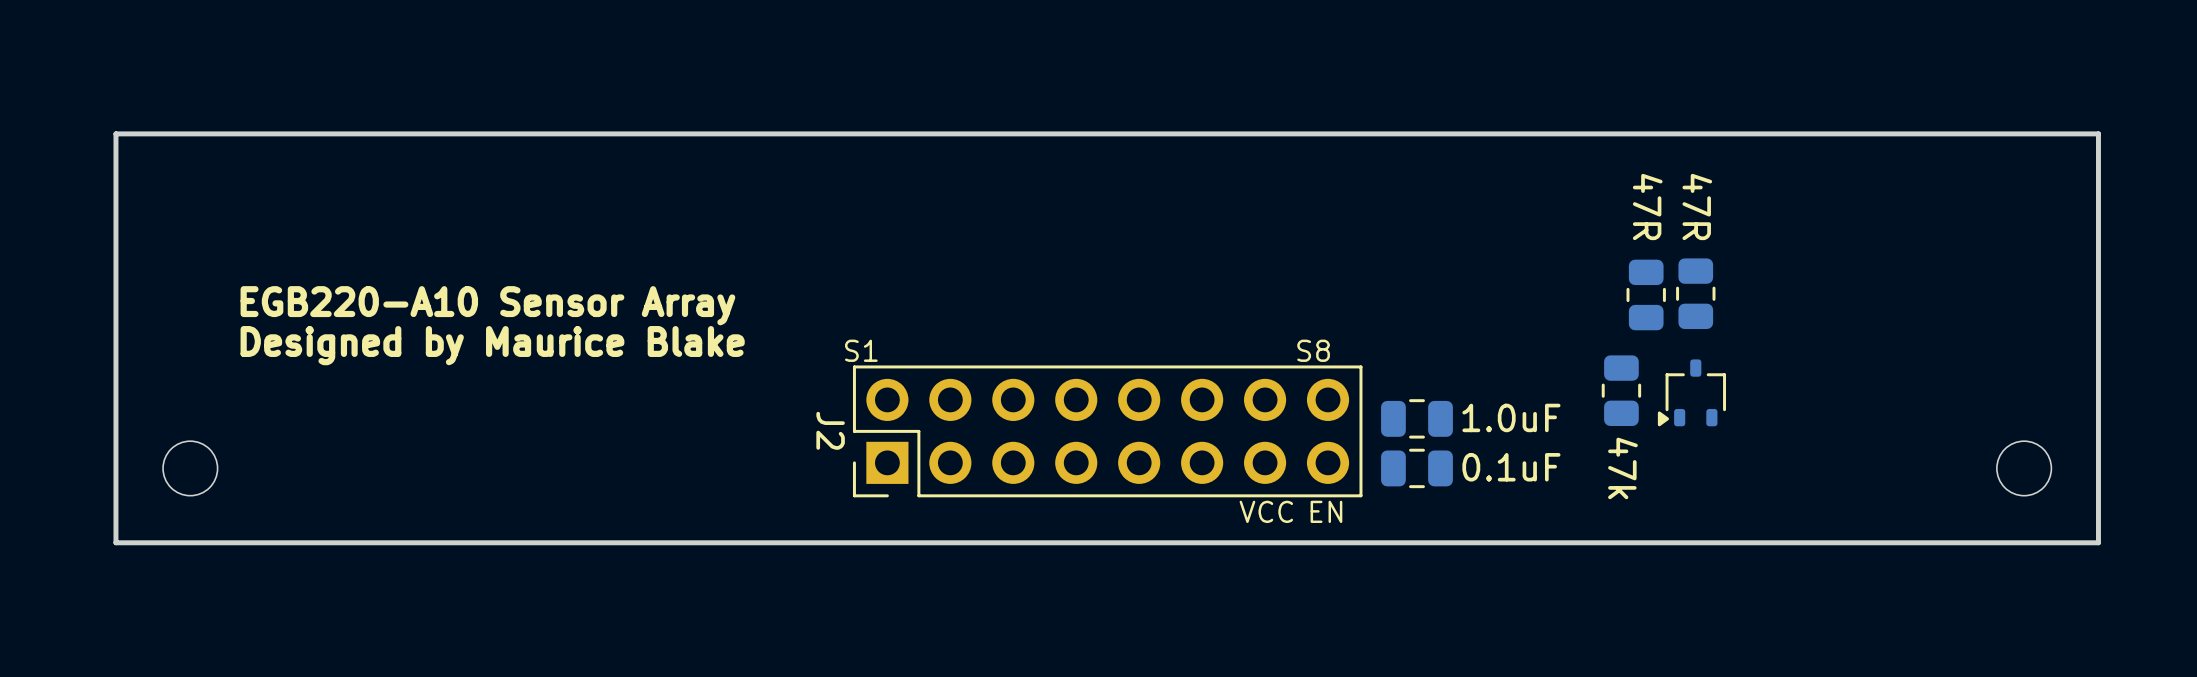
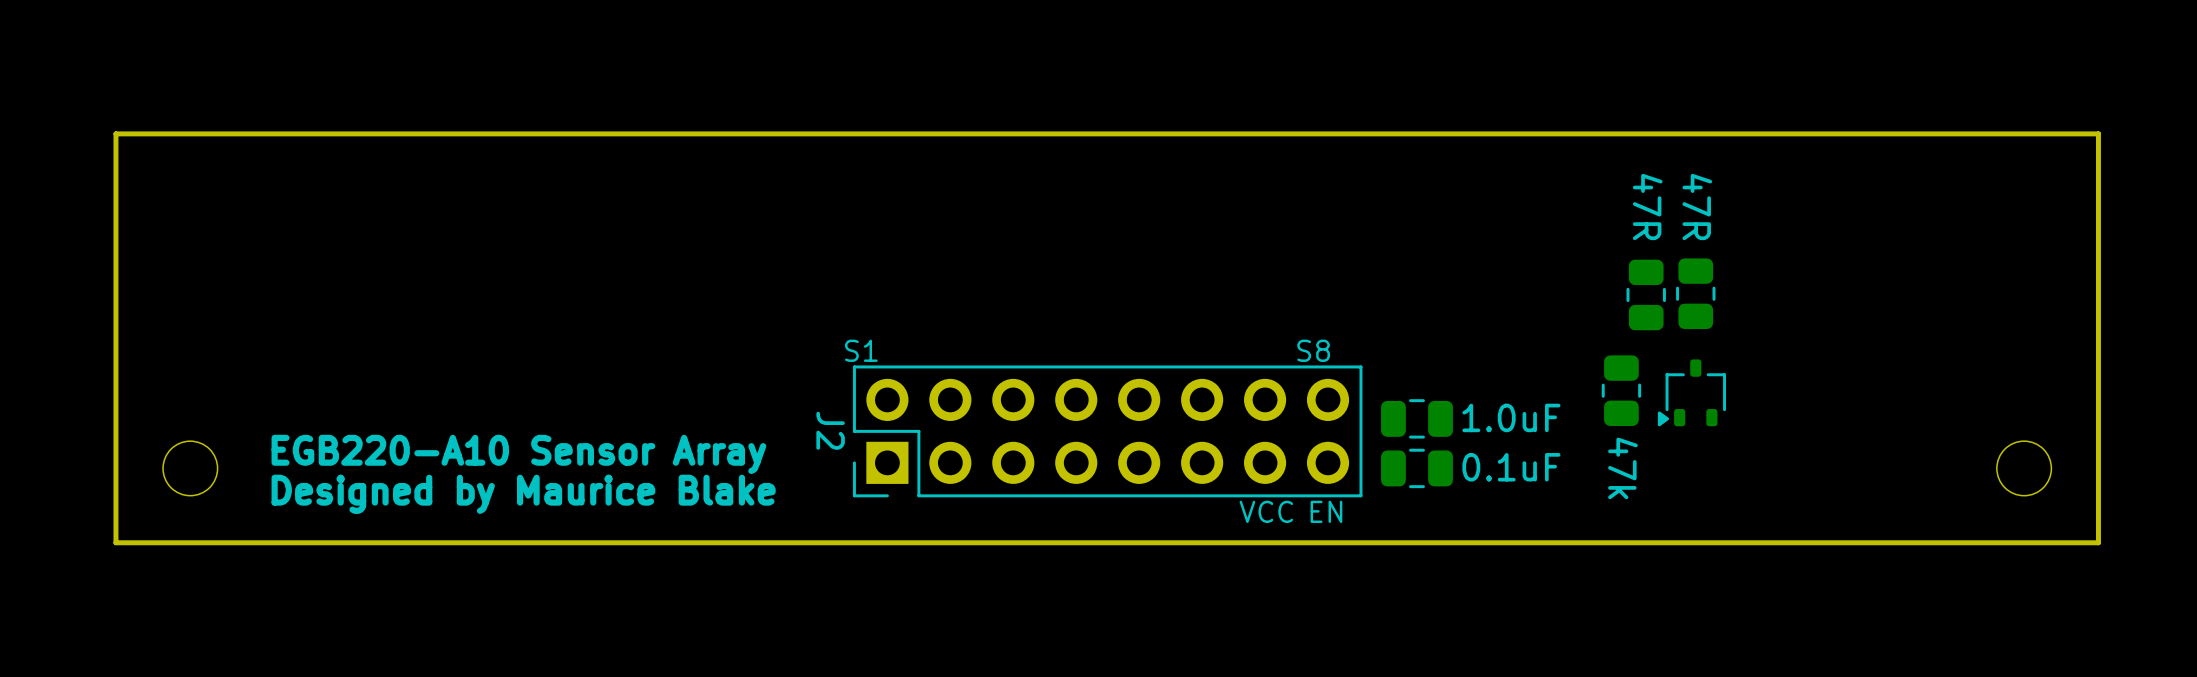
text position: EGB220-A10 Sensor Array (487, 305) -> EGB220-A10 Sensor Array (518, 454)
text position: Designed by Maurice Blake (492, 345) -> Designed by Maurice Blake (523, 494)

